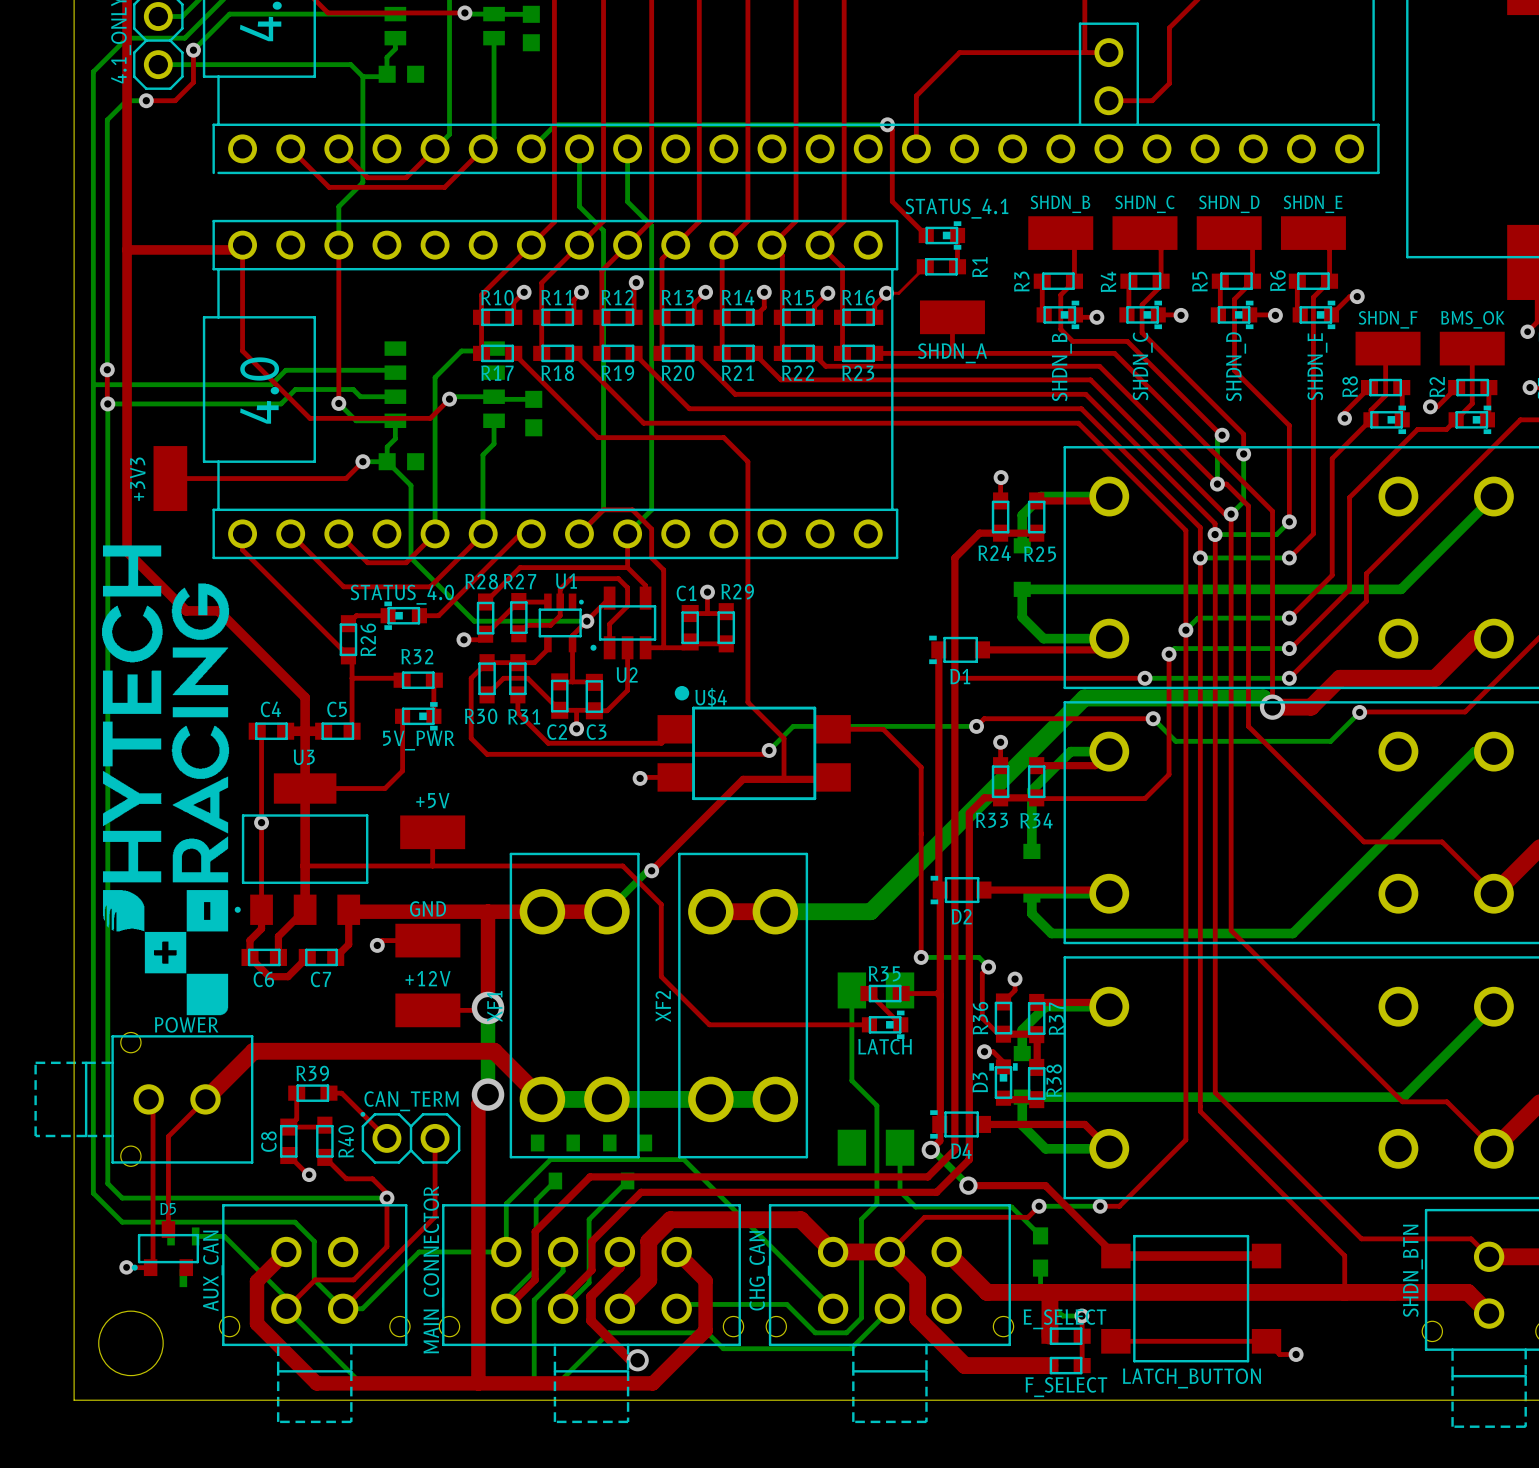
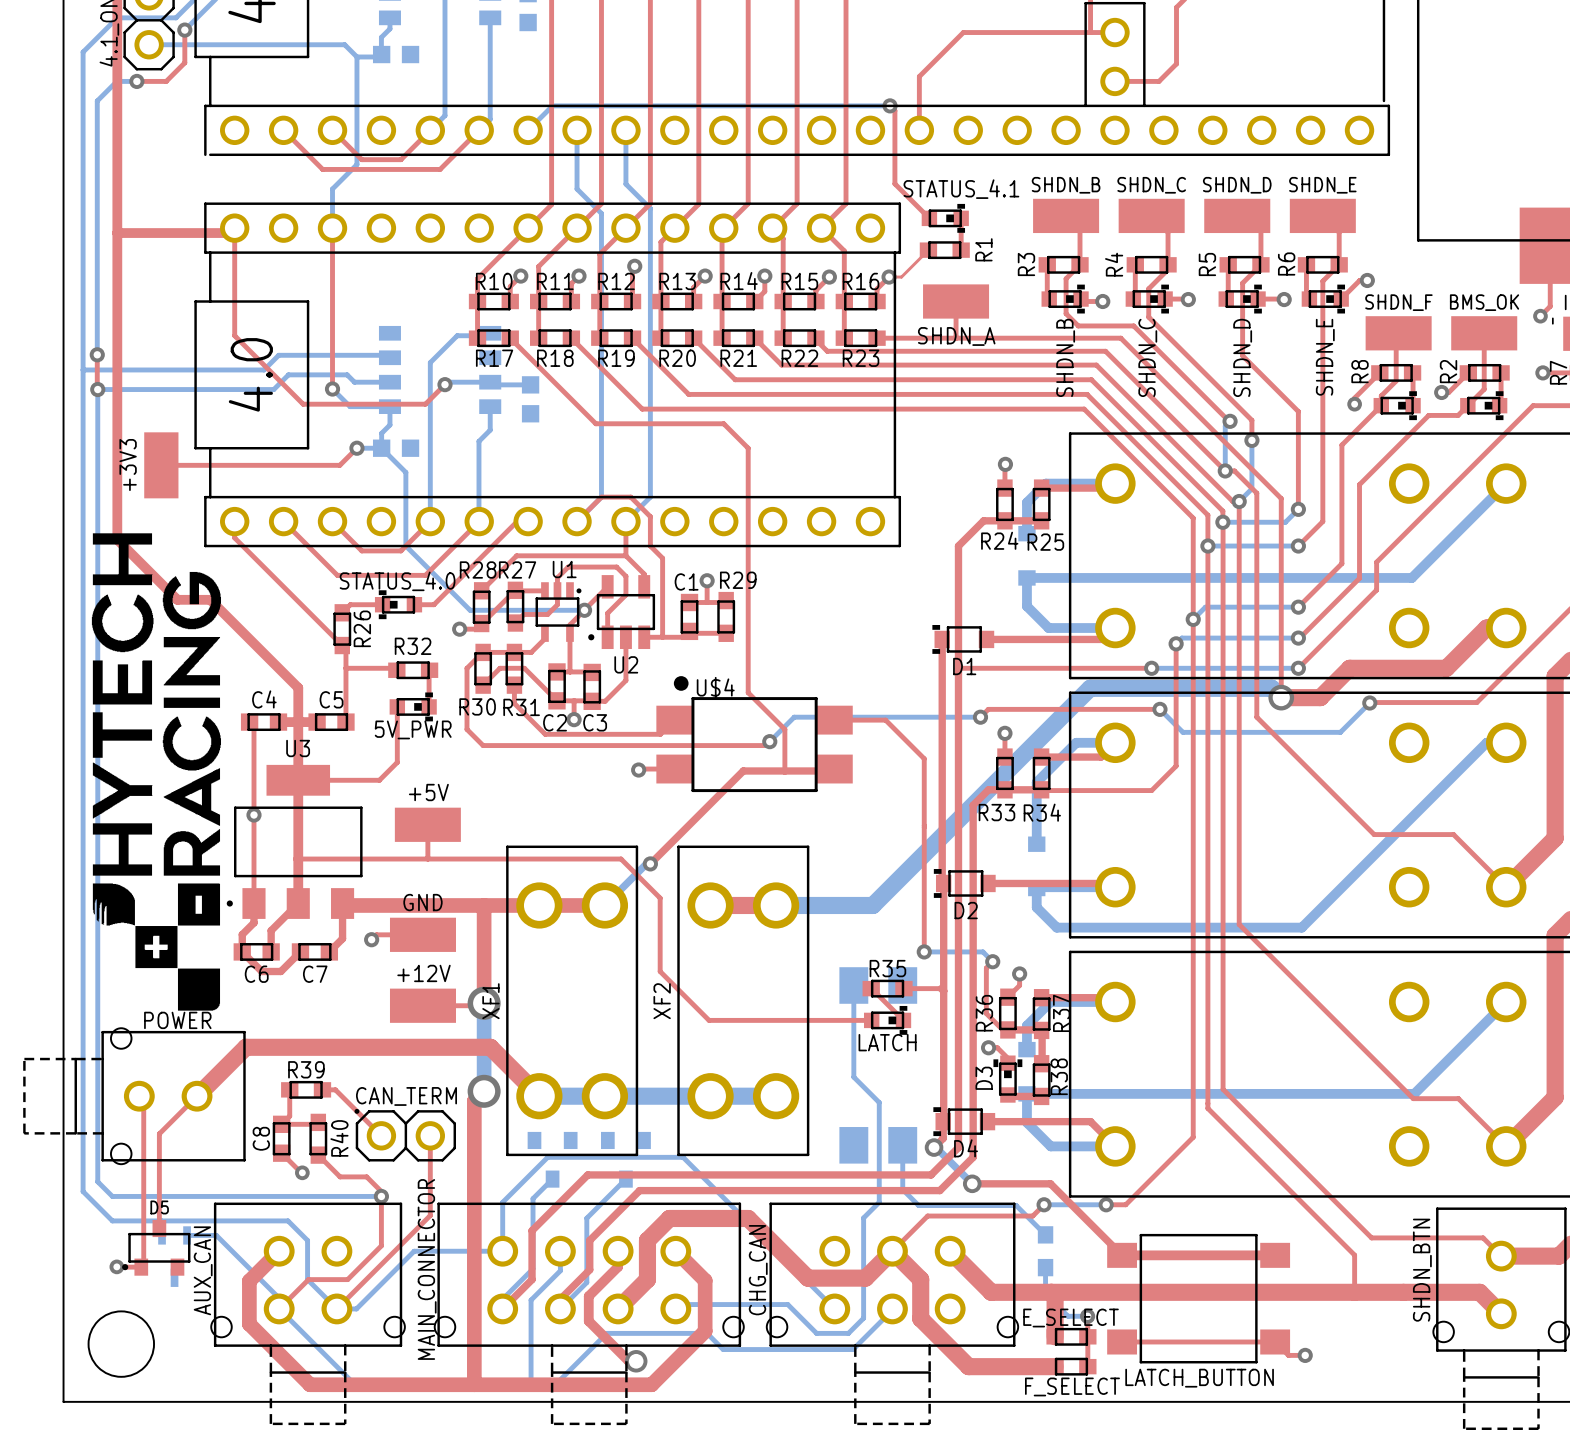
top track: (747, 1219) (800, 1219) (833, 1251) (889, 1251) -> (748, 1218) (807, 1278) (865, 1278) (892, 1251)

